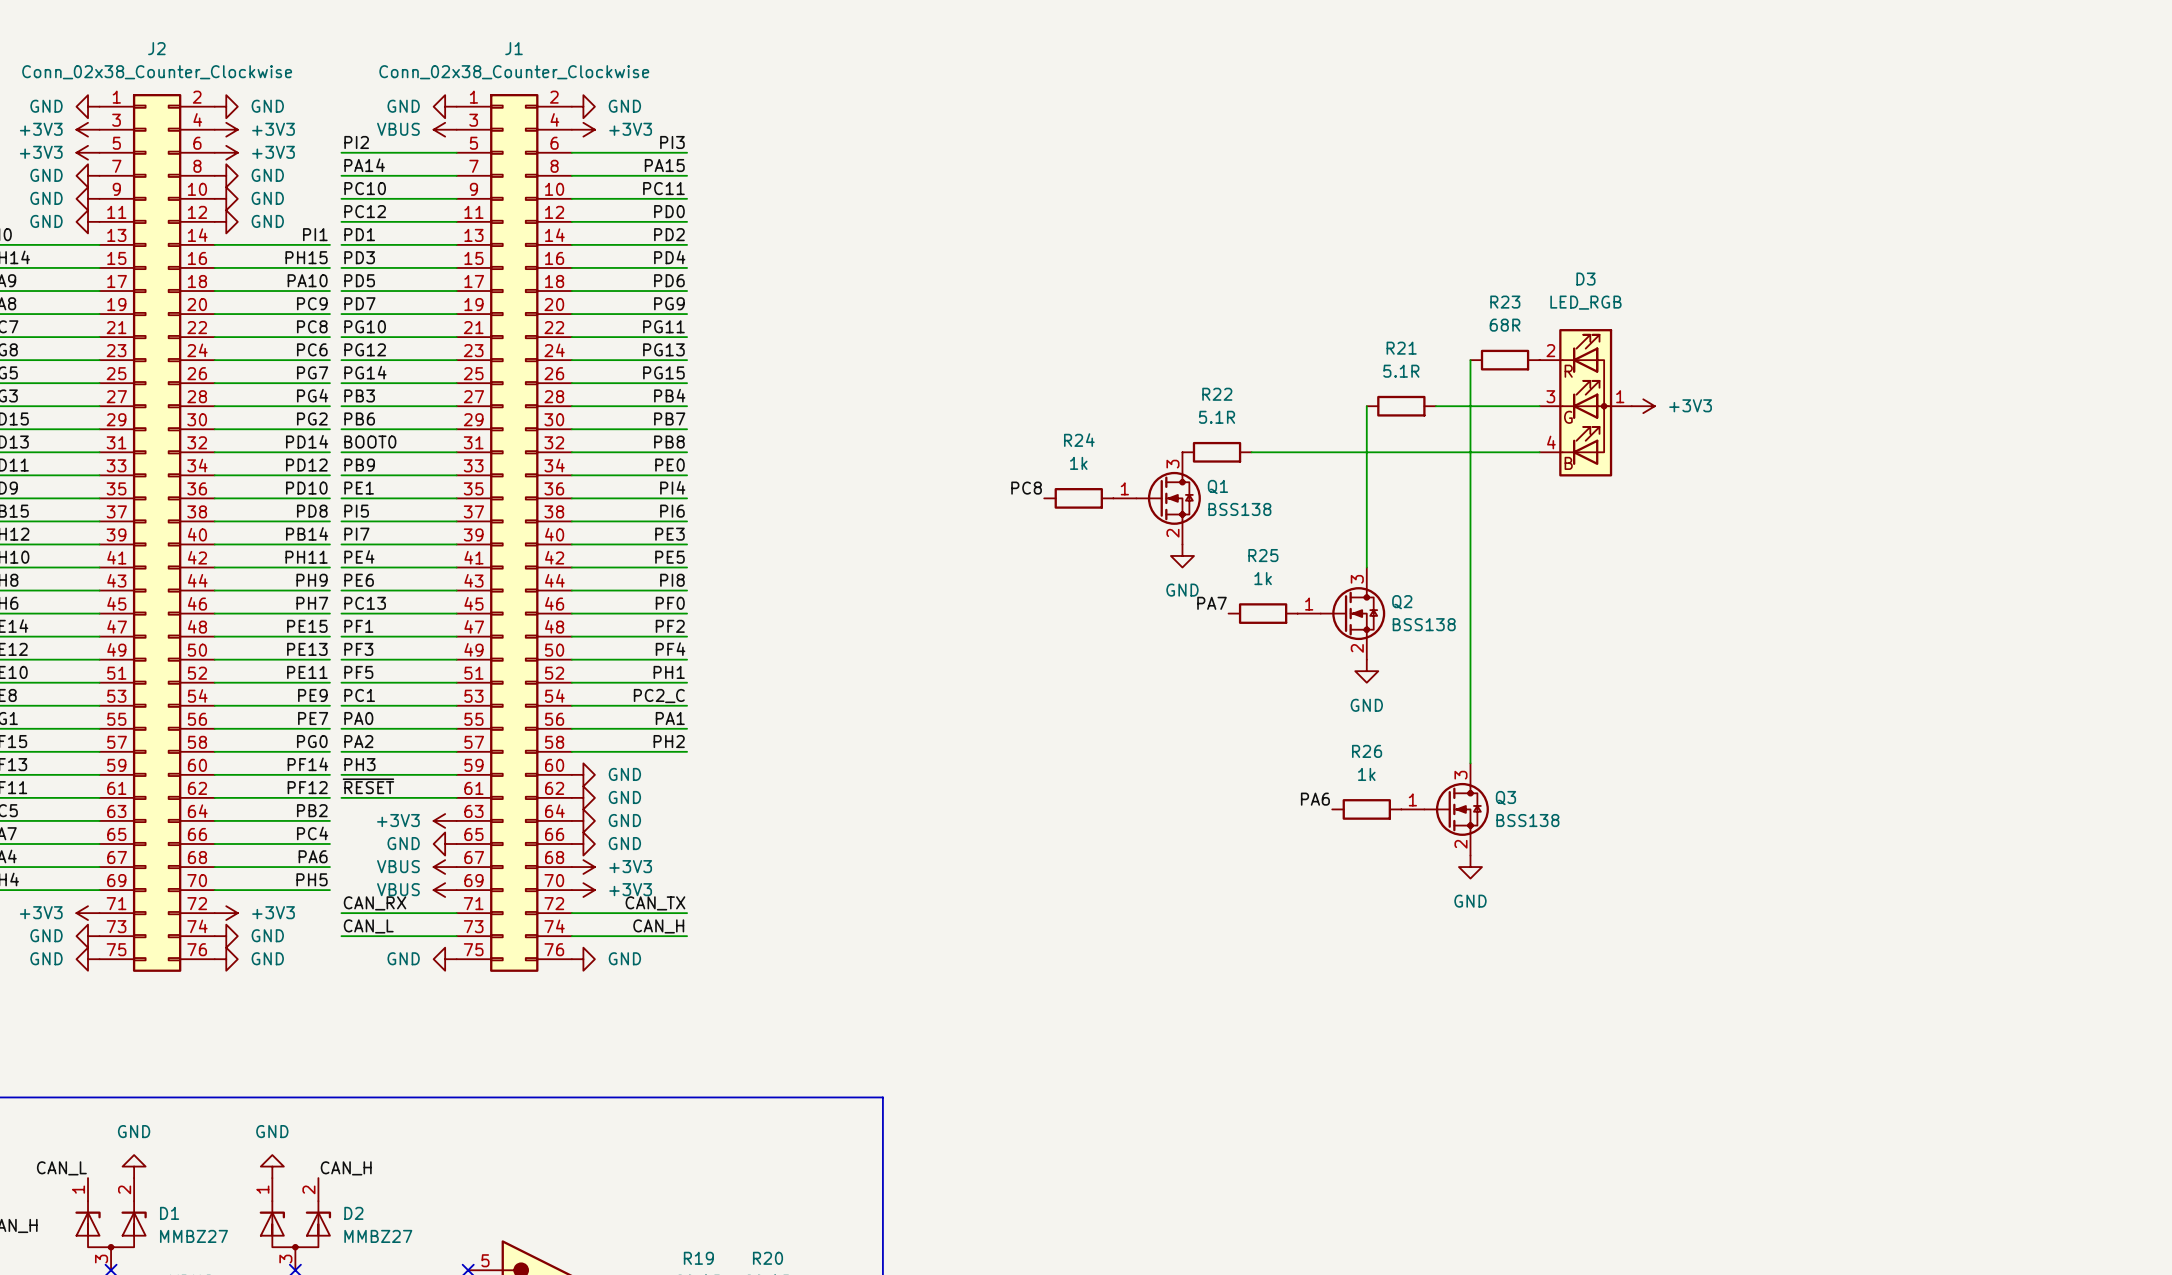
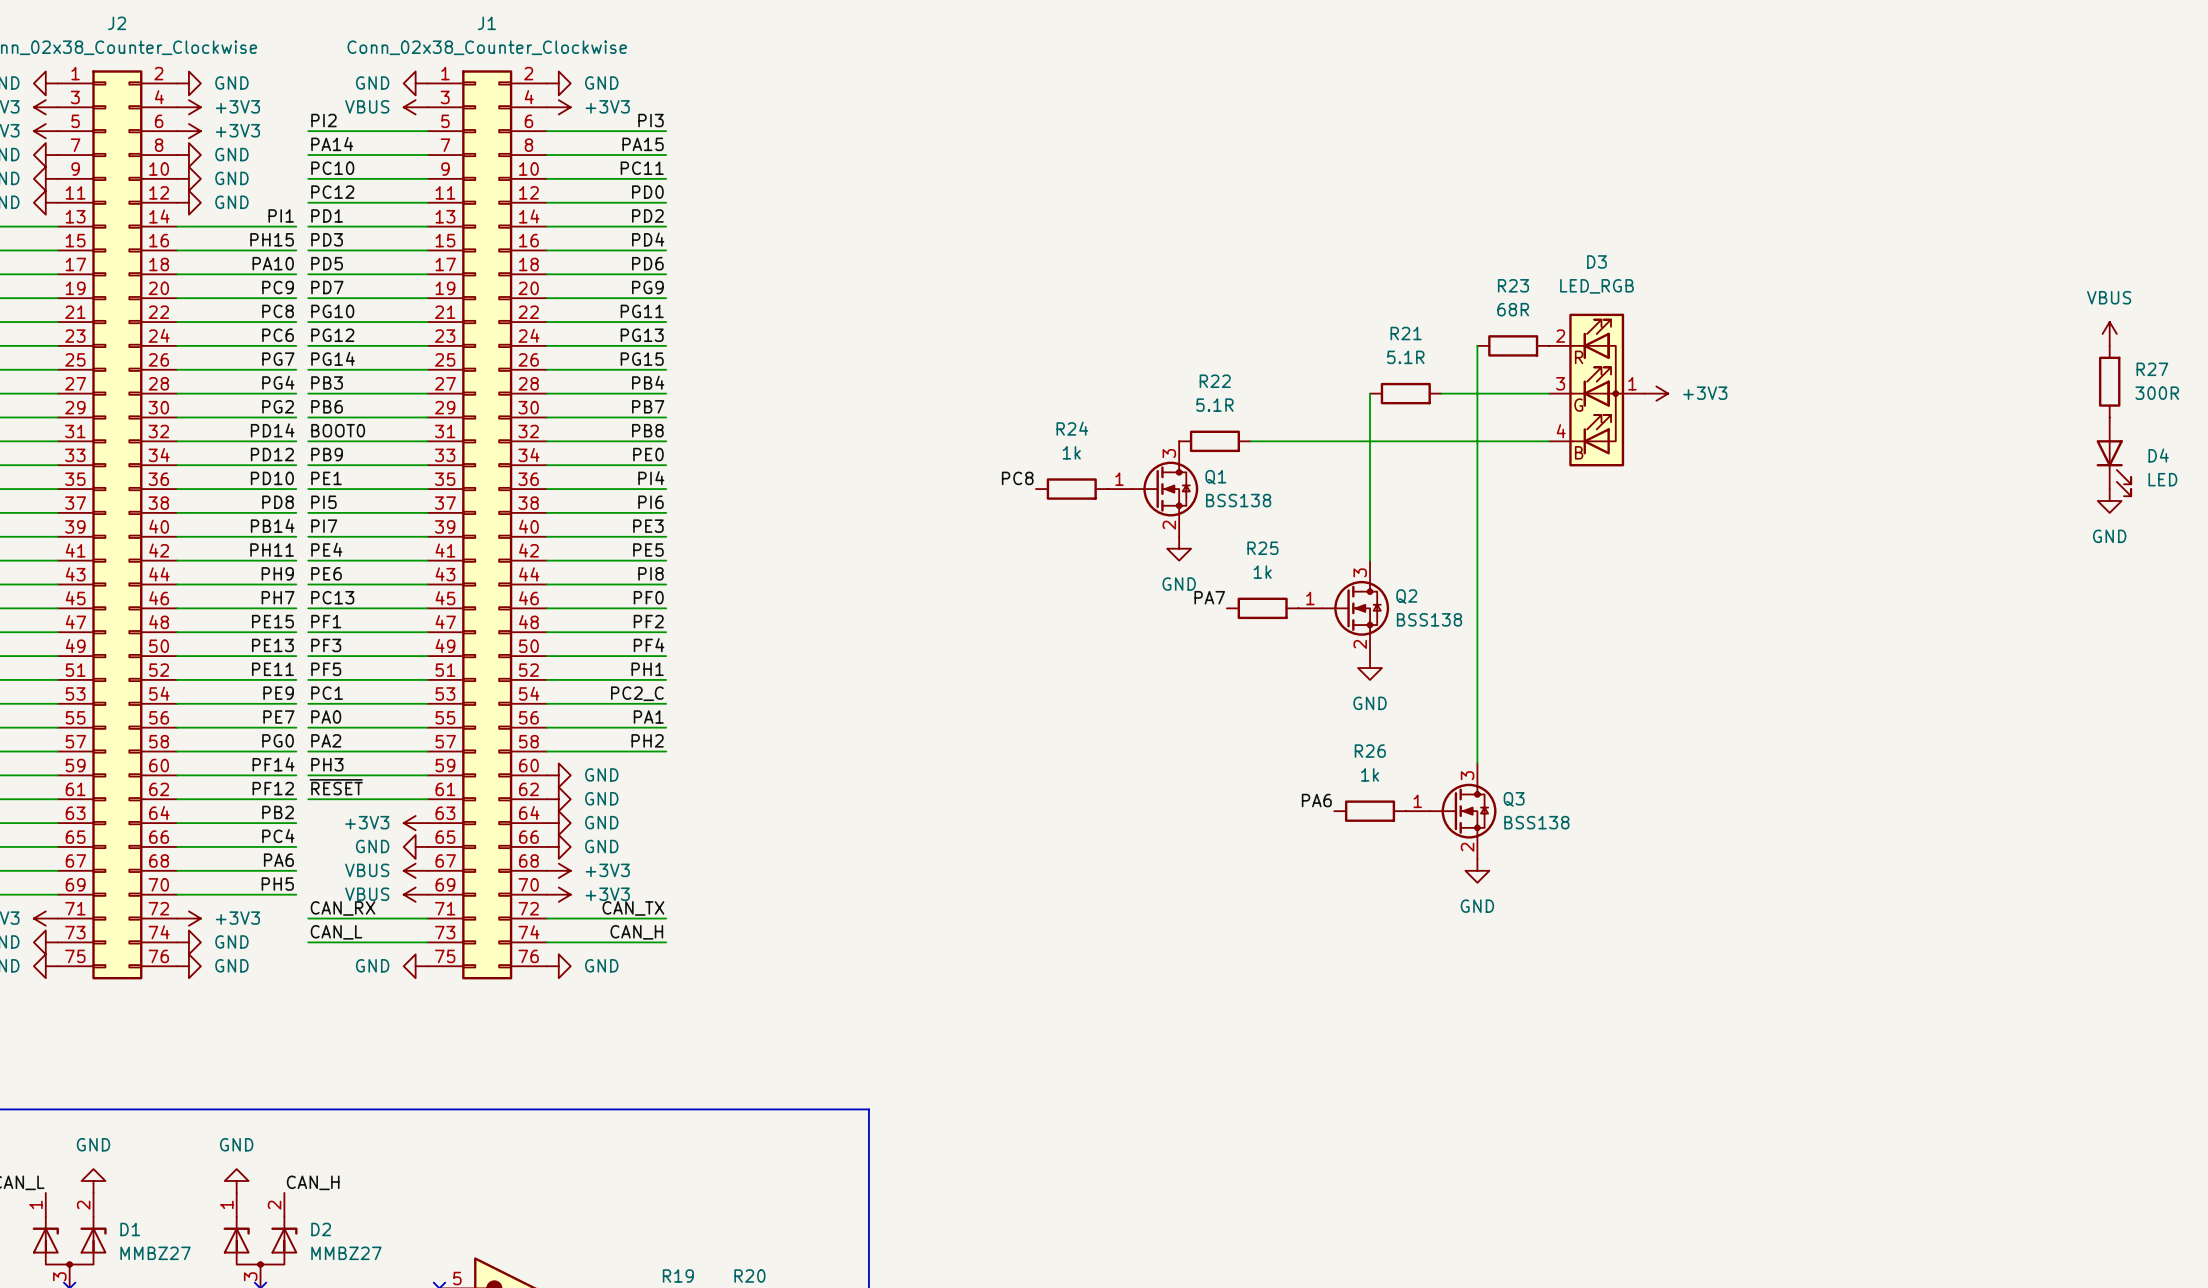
power symbol: none -> VBUS (2109, 333)
R27: none -> 300R (2109, 381)
D4: none -> LED (2113, 456)
power symbol: none -> GND (2109, 500)

